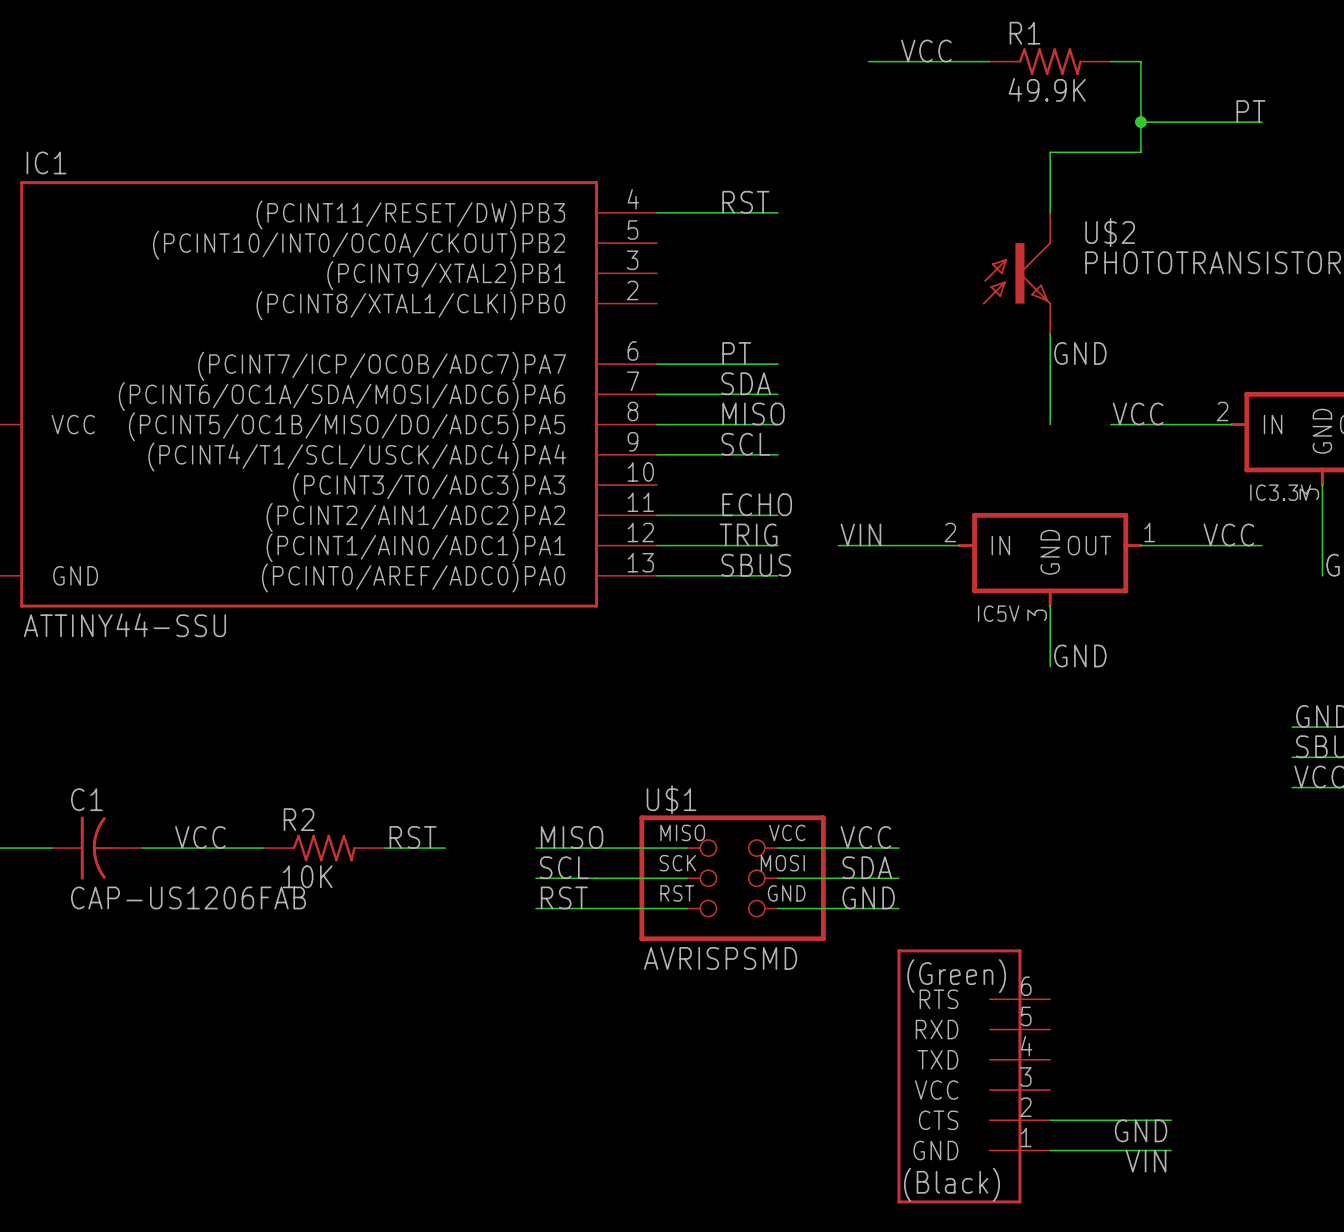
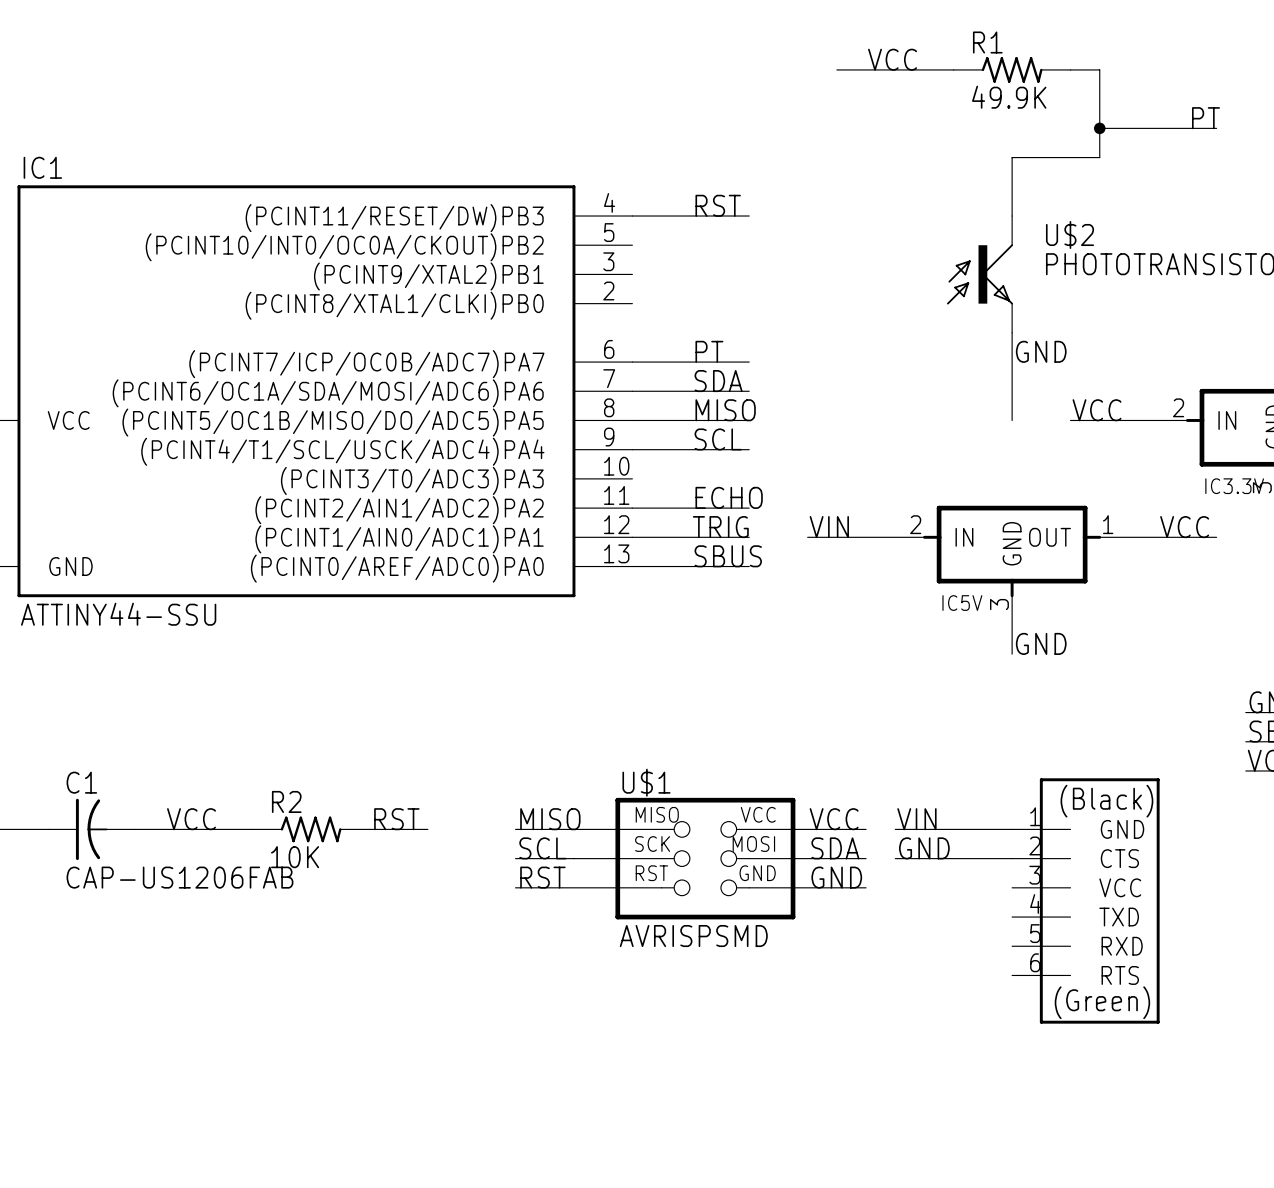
label: none -> VIN (916, 819)
wire: none -> (895, 829) (1012, 829)
label: none -> GND (924, 848)
part: none -> (1085, 900)
part: (973, 1076) -> none
wire: (1050, 1120) (1171, 1120) -> (895, 858) (1012, 858)
label: GND (1141, 1130) -> none
wire: (1050, 1150) (1171, 1150) -> none
label: VIN (1146, 1161) -> none

